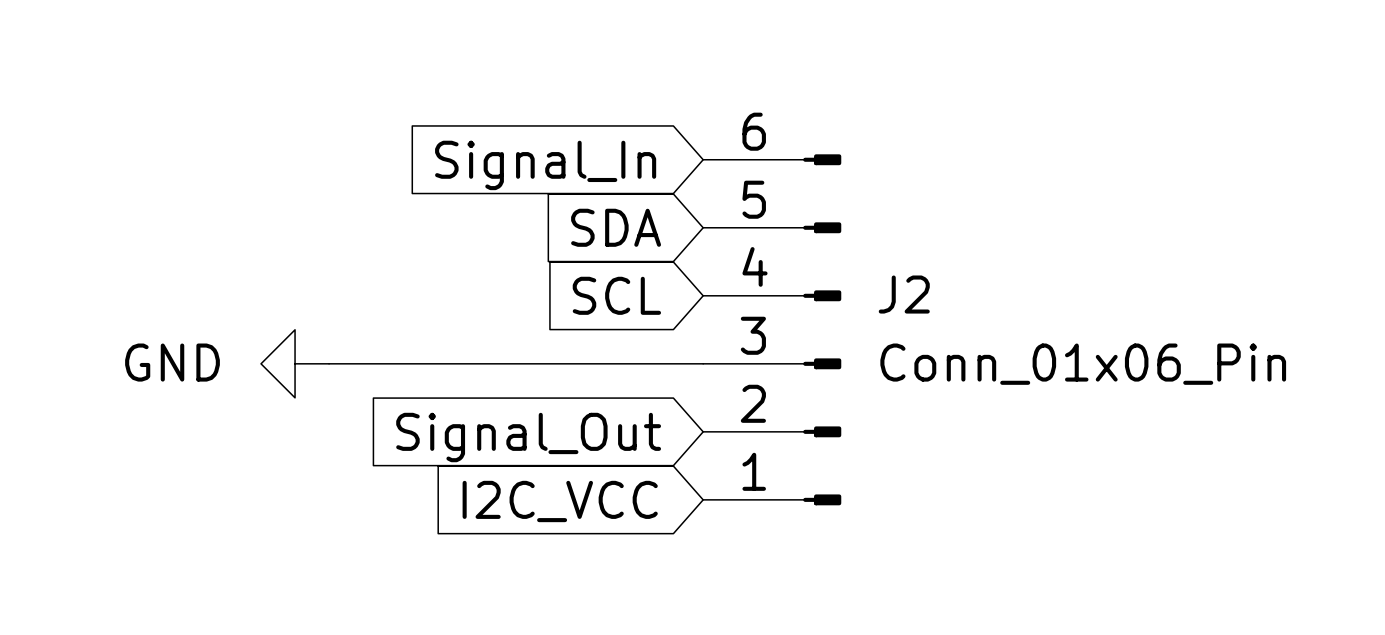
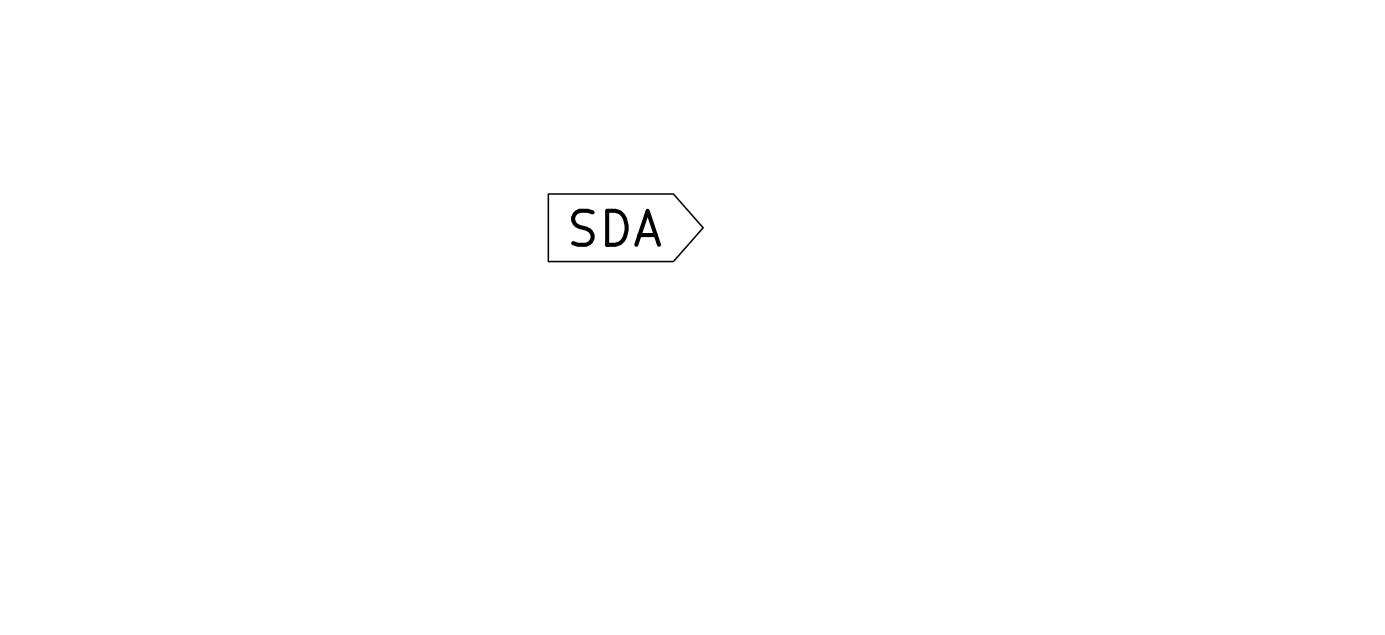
global label: Signal_In (545, 165) -> none
global label: SCL (616, 295) -> none
J2: Conn_01x06_Pin (772, 329) -> none
power symbol: GND (295, 363) -> none
wire: (329, 363) (703, 363) -> none
global label: Signal_Out (528, 437) -> none
global label: I2C_VCC (560, 501) -> none

